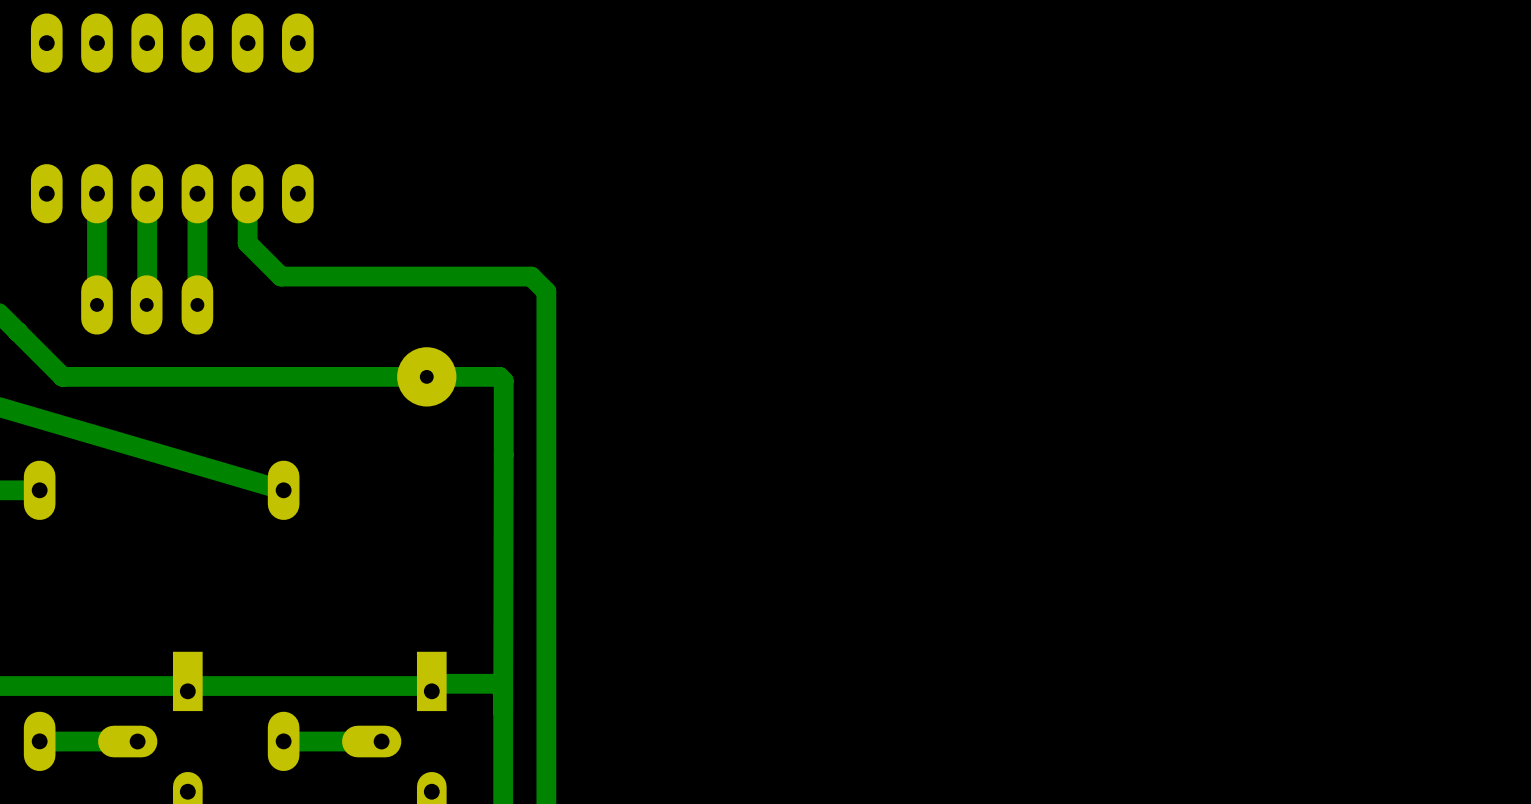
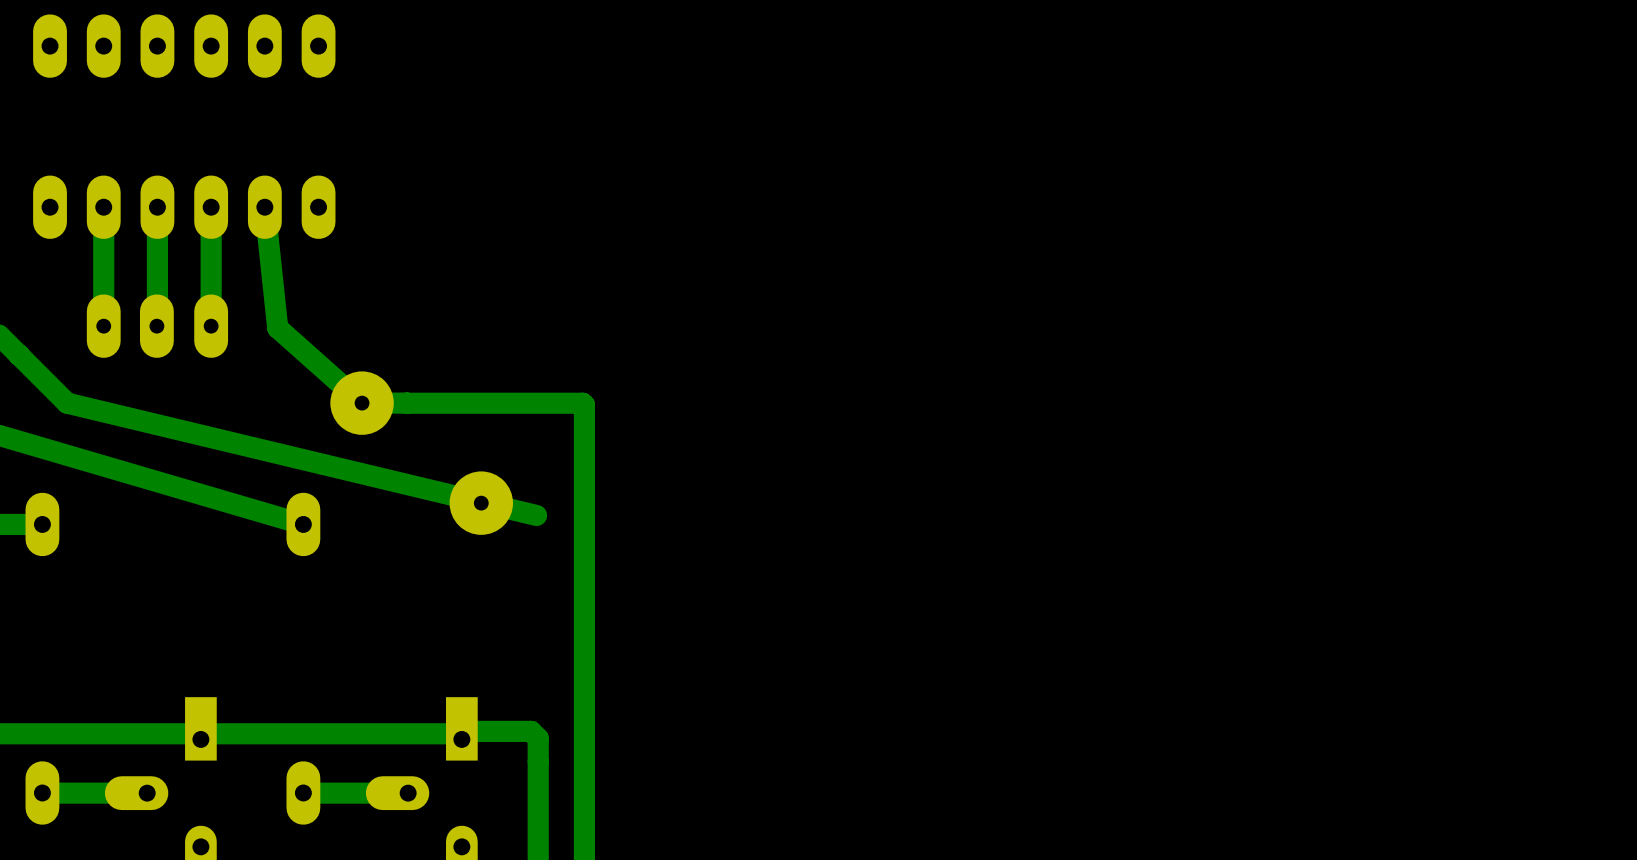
bottom track: (247, 193) (247, 243) (281, 276) (531, 276) (546, 291) (546, 378) -> (264, 207) (277, 328) (362, 403)
bottom track: (338, 376) (62, 376) -> (536, 515) (67, 403)
part: none -> (362, 403)
bottom track: (380, 376) (499, 376) (503, 381) (503, 711) -> (407, 403) (582, 403) (584, 404)
part: (426, 376) -> none
part: none -> (481, 503)

